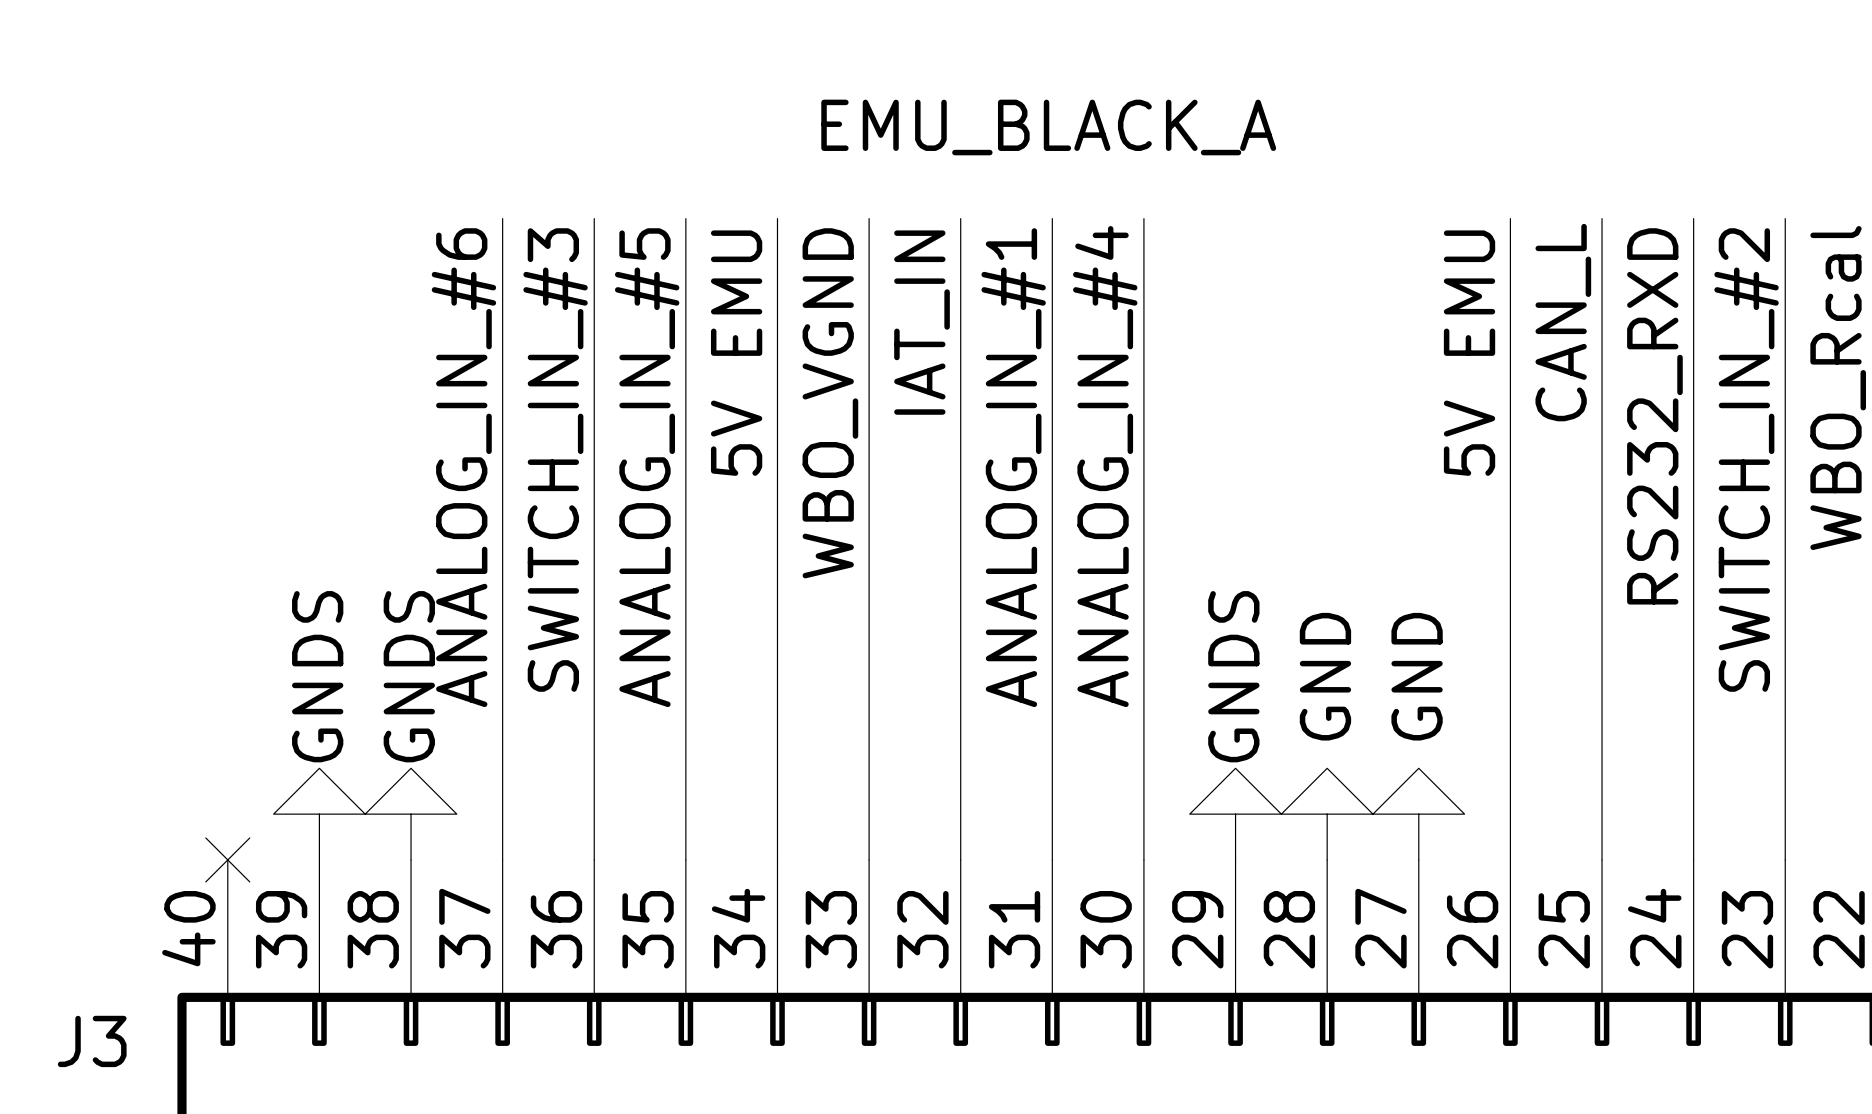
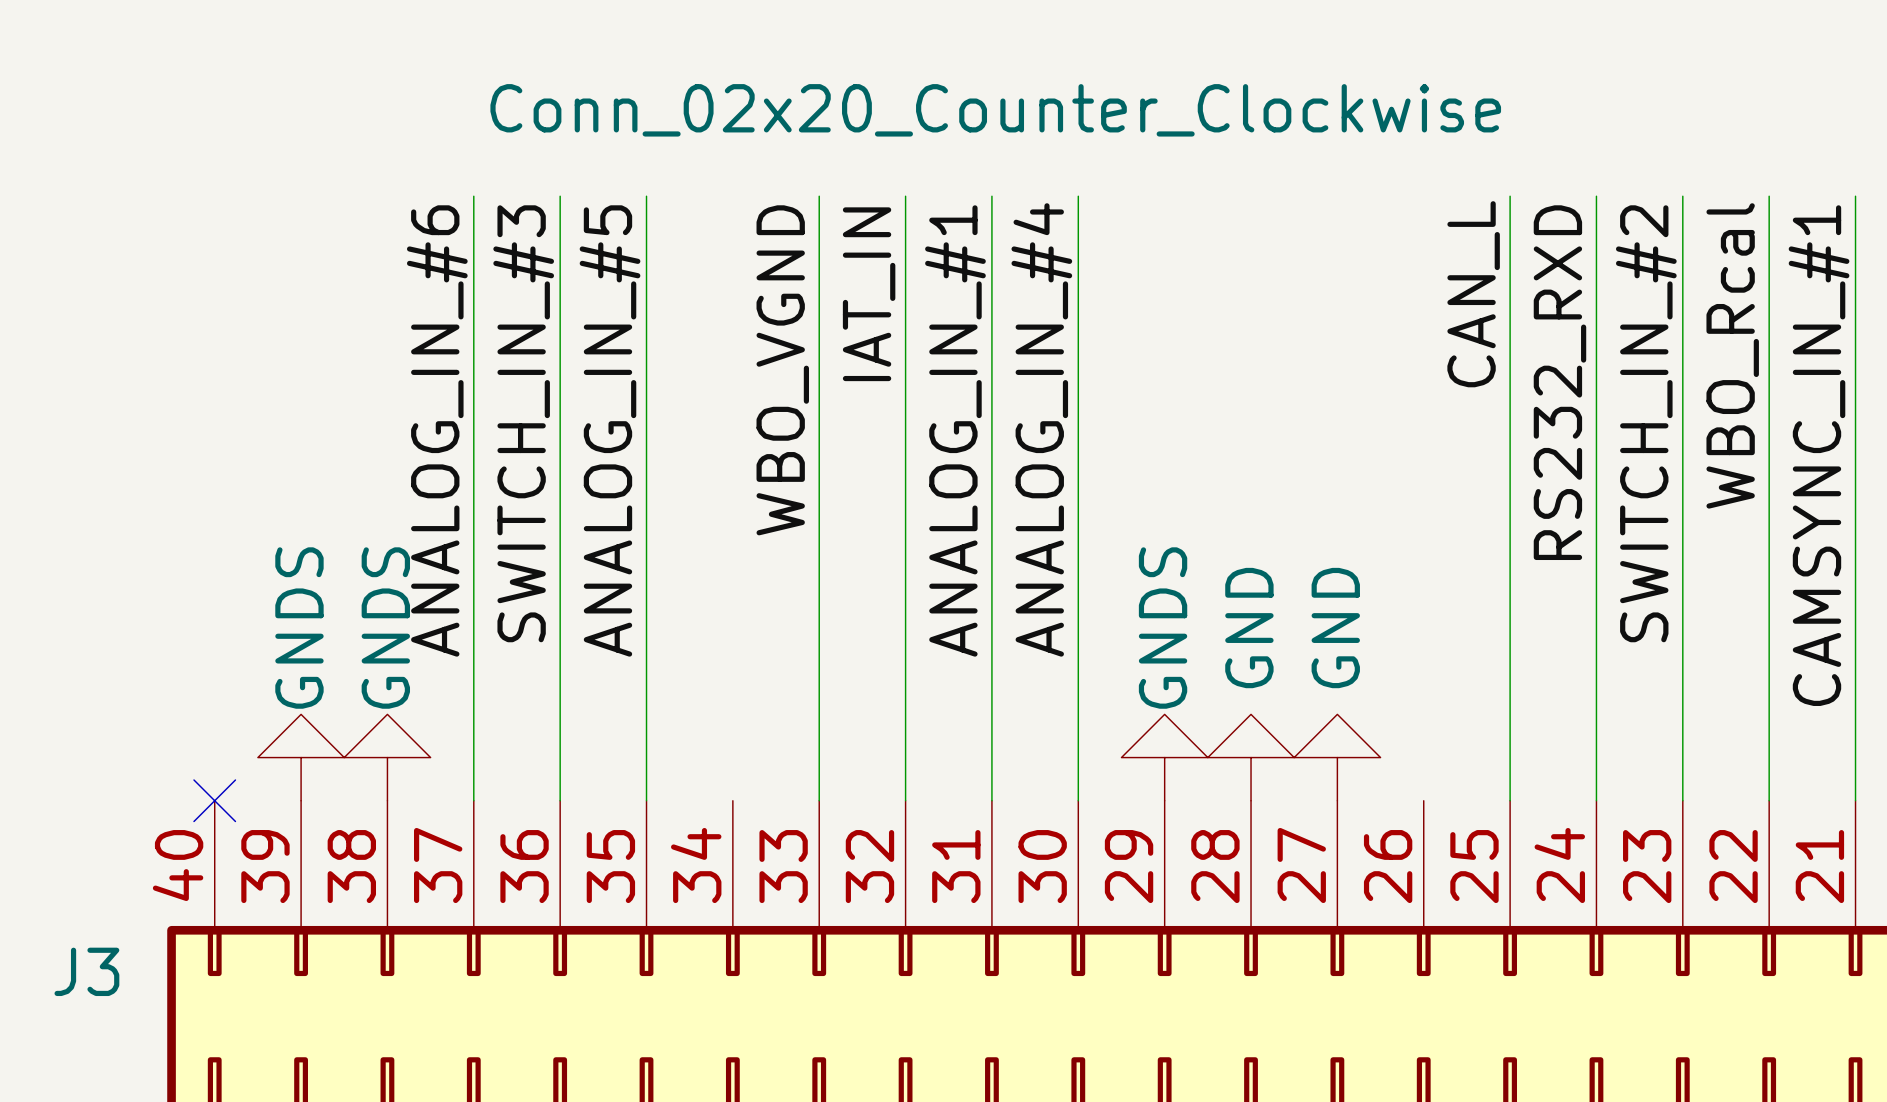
J3 value: EMU_BLACK_A (1048, 127) -> Conn_02x20_Counter_Clockwise (995, 110)
wire: (777, 218) (777, 859) -> none
wire: (1510, 218) (1510, 859) -> none
label: 5V EMU (736, 353) -> none
label: 5V EMU (1469, 353) -> none

